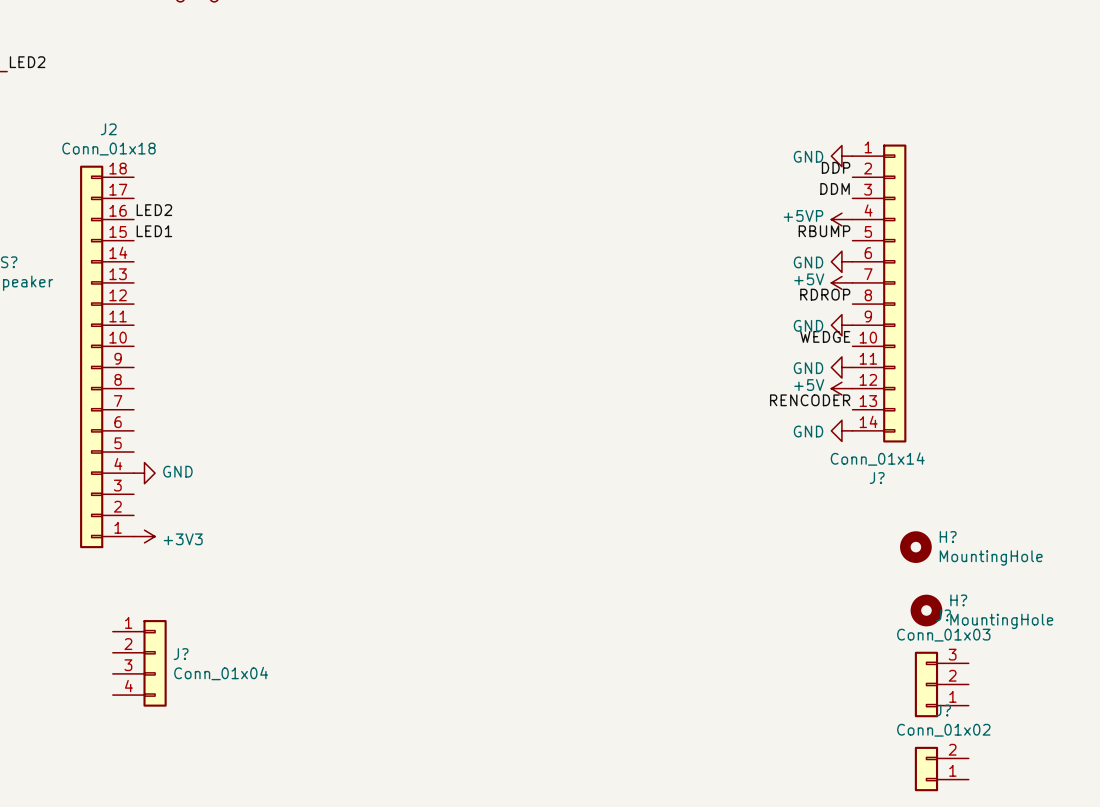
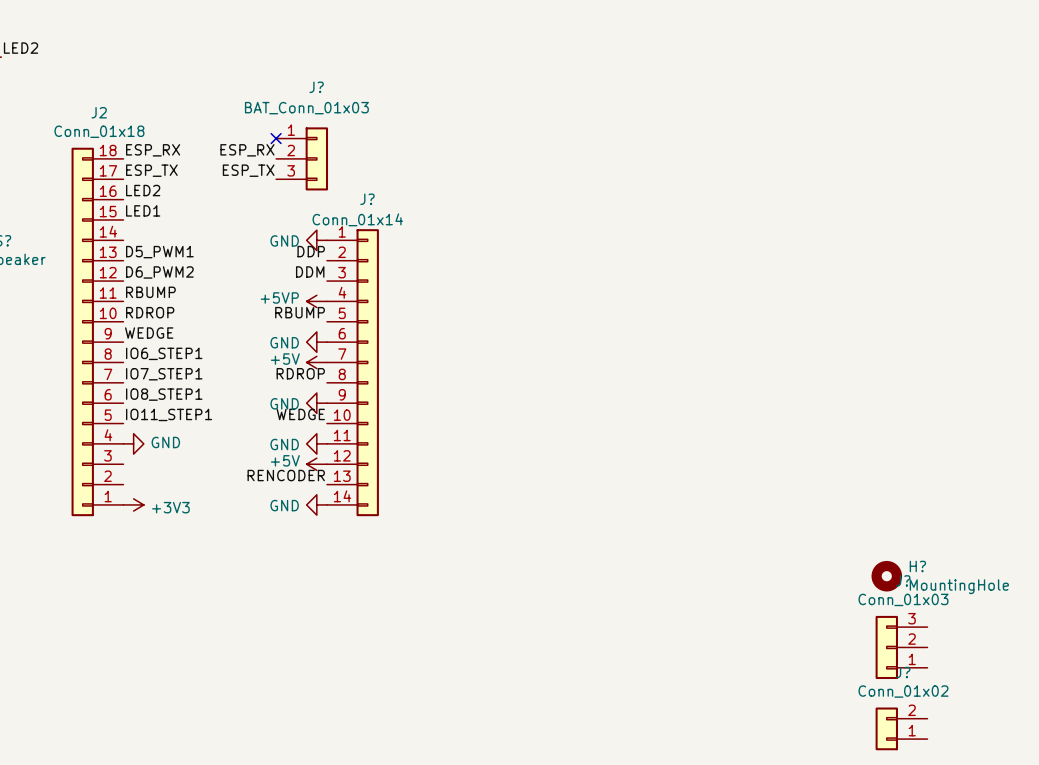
no-connect mark: none -> (276, 138)
power symbol: GND (841, 156) -> none
label: DDP (836, 167) -> none
label: none -> ESP_RX (153, 150)
label: none -> ESP_RX (247, 150)
J?: none -> BAT_Conn_01x03 (302, 158)
label: DDM (835, 188) -> none
label: none -> ESP_TX (151, 170)
label: none -> ESP_TX (248, 170)
power symbol: +5VP (841, 219) -> none
label: RBUMP (824, 231) -> none
power symbol: none -> GND (316, 240)
power symbol: GND (841, 261) -> none
label: none -> DDP (311, 251)
label: none -> D5_PWM1 (159, 252)
power symbol: +5V (841, 282) -> none
J?: Conn_01x14 (879, 293) -> none
label: none -> DDM (310, 271)
label: RDROP (825, 294) -> none
label: none -> D6_PWM2 (159, 272)
label: none -> RBUMP (150, 292)
power symbol: none -> +5VP (316, 301)
power symbol: GND (841, 325) -> none
label: none -> RDROP (150, 312)
label: none -> RBUMP (300, 312)
label: WEDGE (825, 336) -> none
label: none -> WEDGE (149, 333)
power symbol: none -> GND (316, 342)
power symbol: GND (841, 367) -> none
label: none -> IO6_STEP1 (164, 353)
power symbol: none -> +5V (316, 362)
power symbol: +5V (841, 388) -> none
J?: none -> Conn_01x14 (352, 372)
label: none -> IO7_STEP1 (164, 374)
label: none -> RDROP (300, 373)
label: RENCODER (810, 400) -> none
label: none -> IO8_STEP1 (164, 394)
power symbol: none -> GND (316, 403)
power symbol: GND (841, 430) -> none
label: none -> WEDGE (300, 414)
label: none -> IO11_STEP1 (169, 414)
power symbol: none -> GND (316, 443)
power symbol: none -> +5V (316, 464)
label: none -> RENCODER (286, 475)
power symbol: none -> GND (316, 504)
H?: MountingHole (915, 547) -> none
J?: Conn_01x04 (139, 663) -> none

